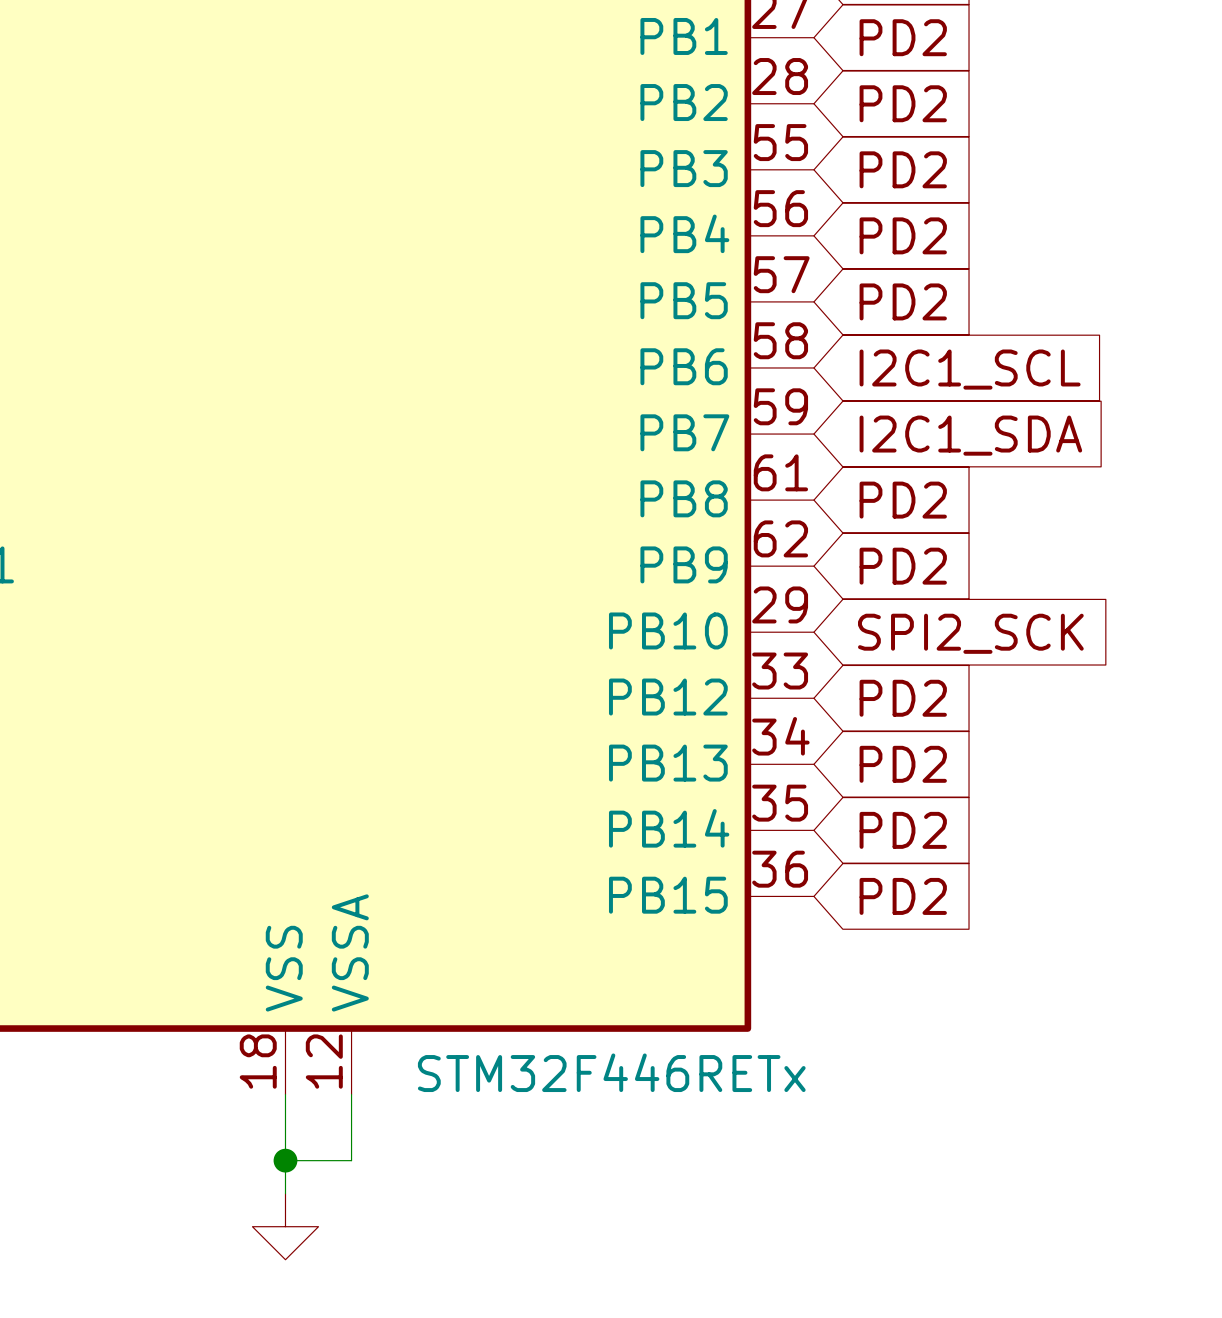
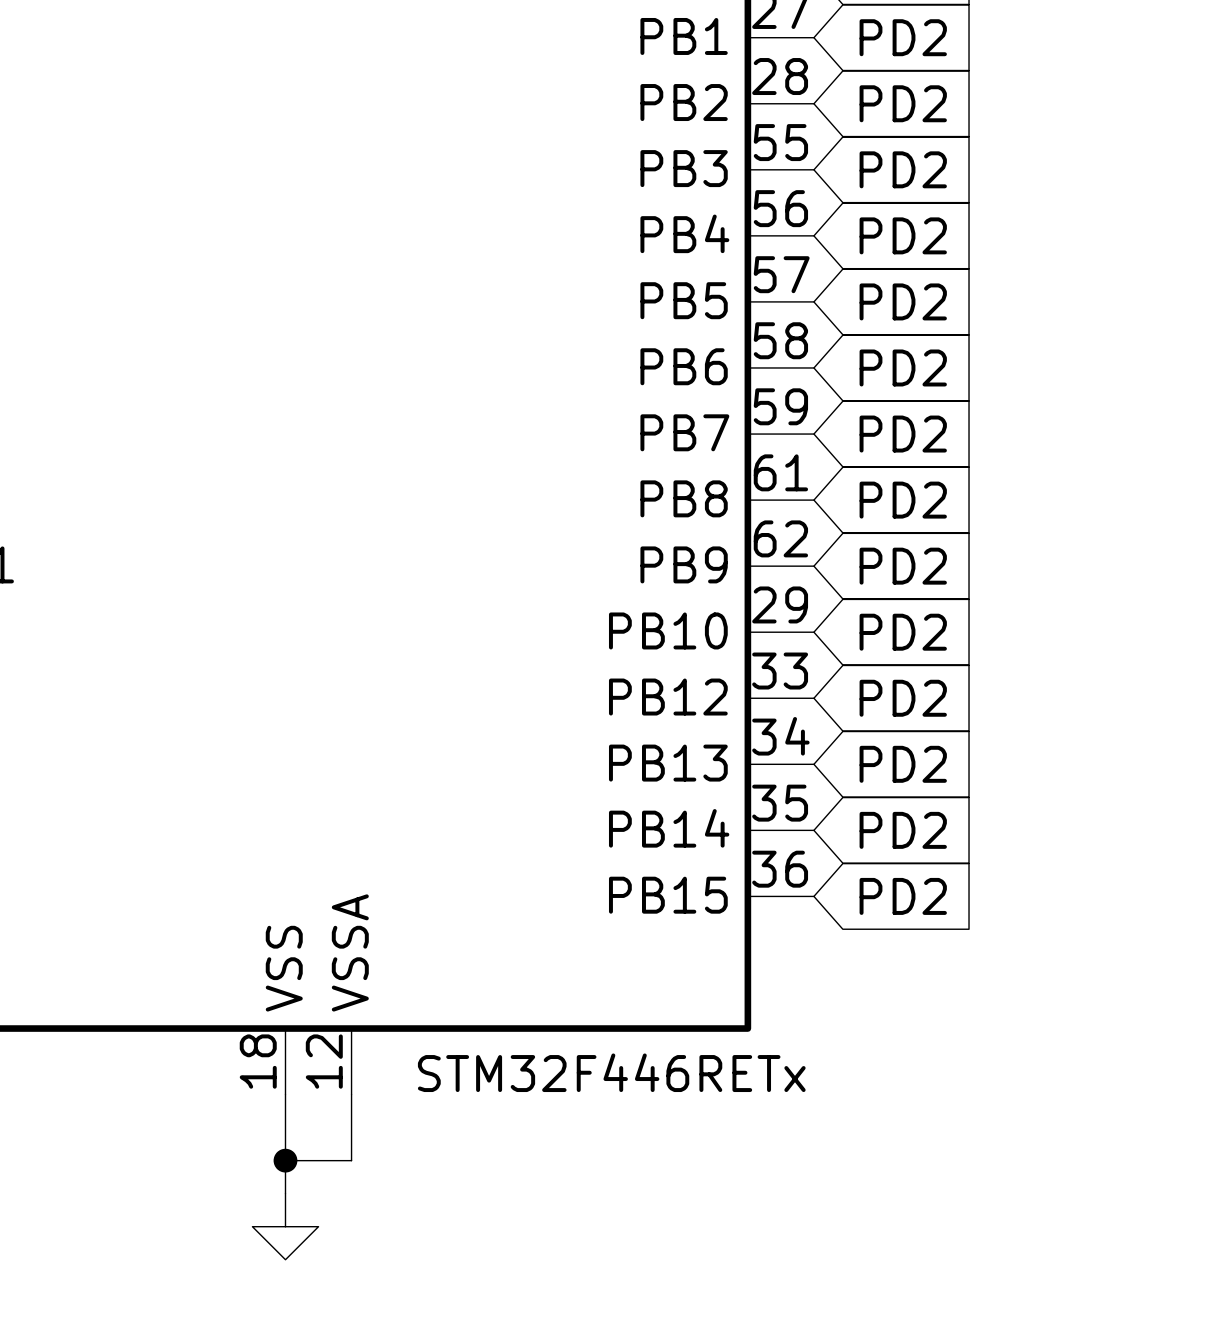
global label: I2C1_SCL (970, 369) -> PD2 (903, 367)
global label: I2C1_SDA (970, 435) -> PD2 (903, 434)
global label: SPI2_SCK (970, 633) -> PD2 (903, 632)

